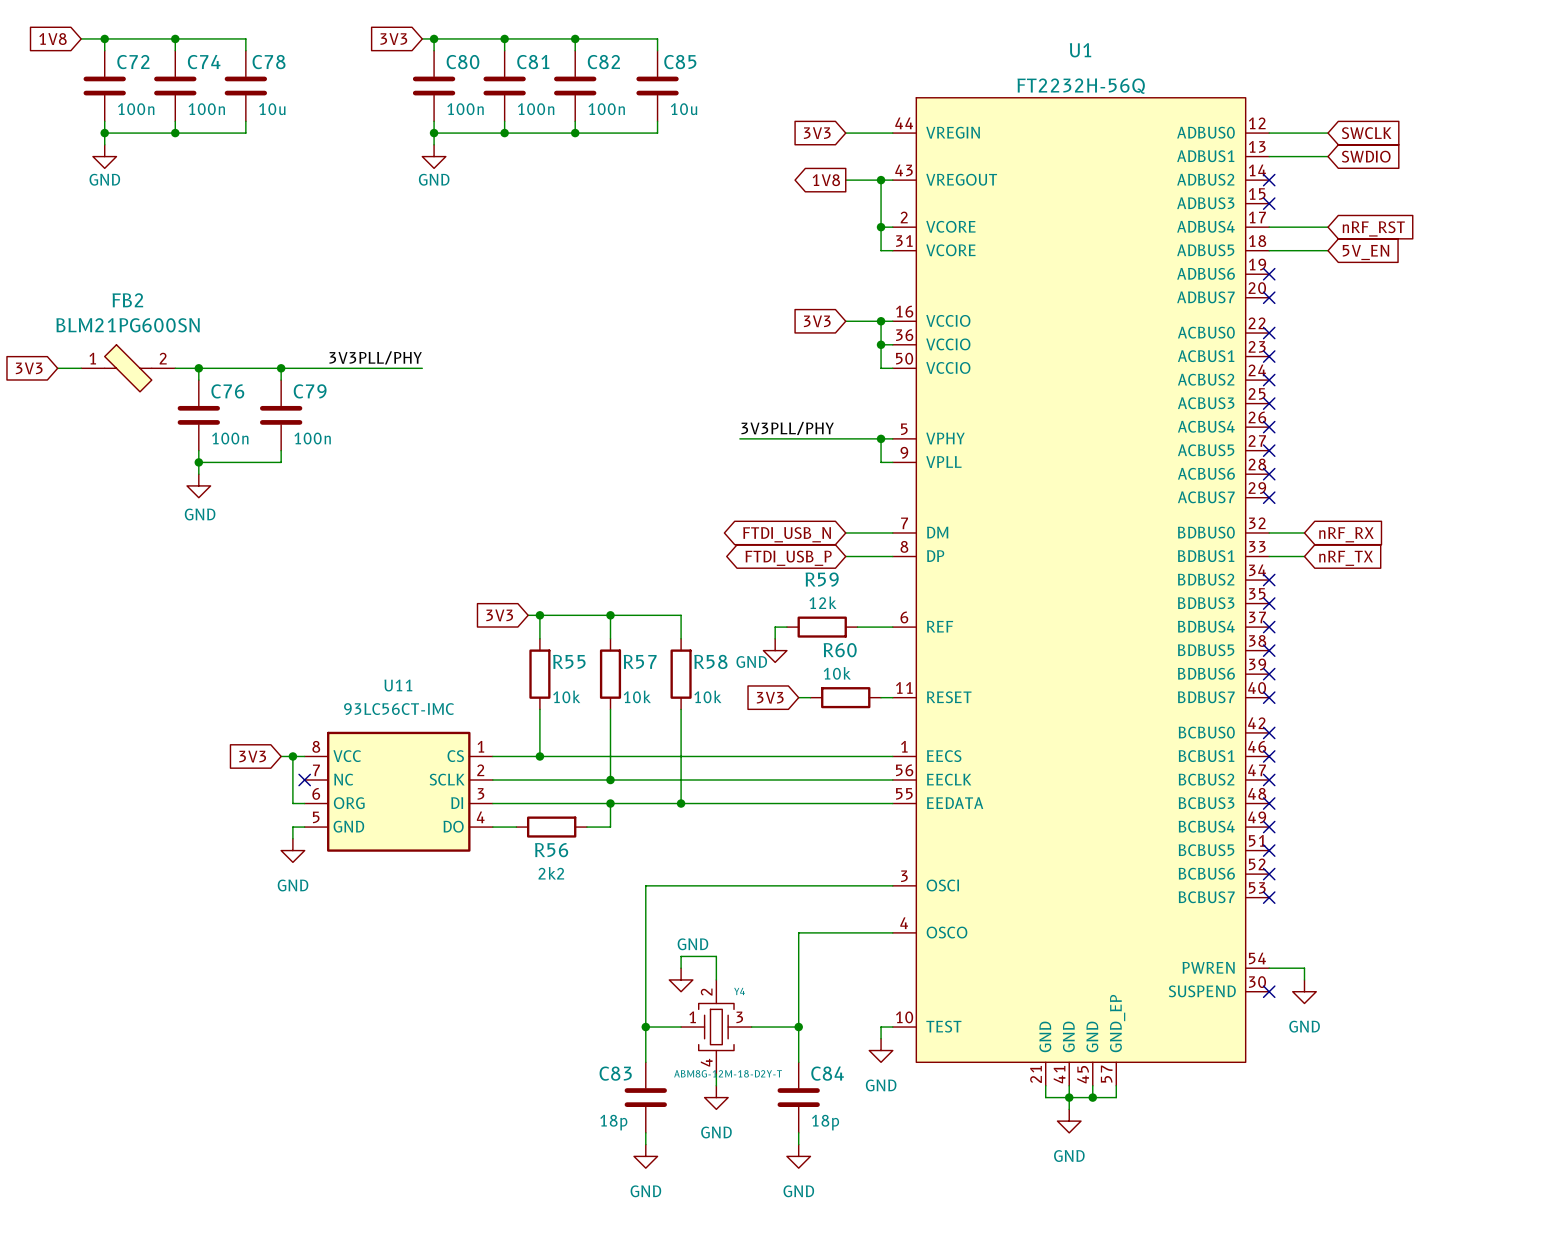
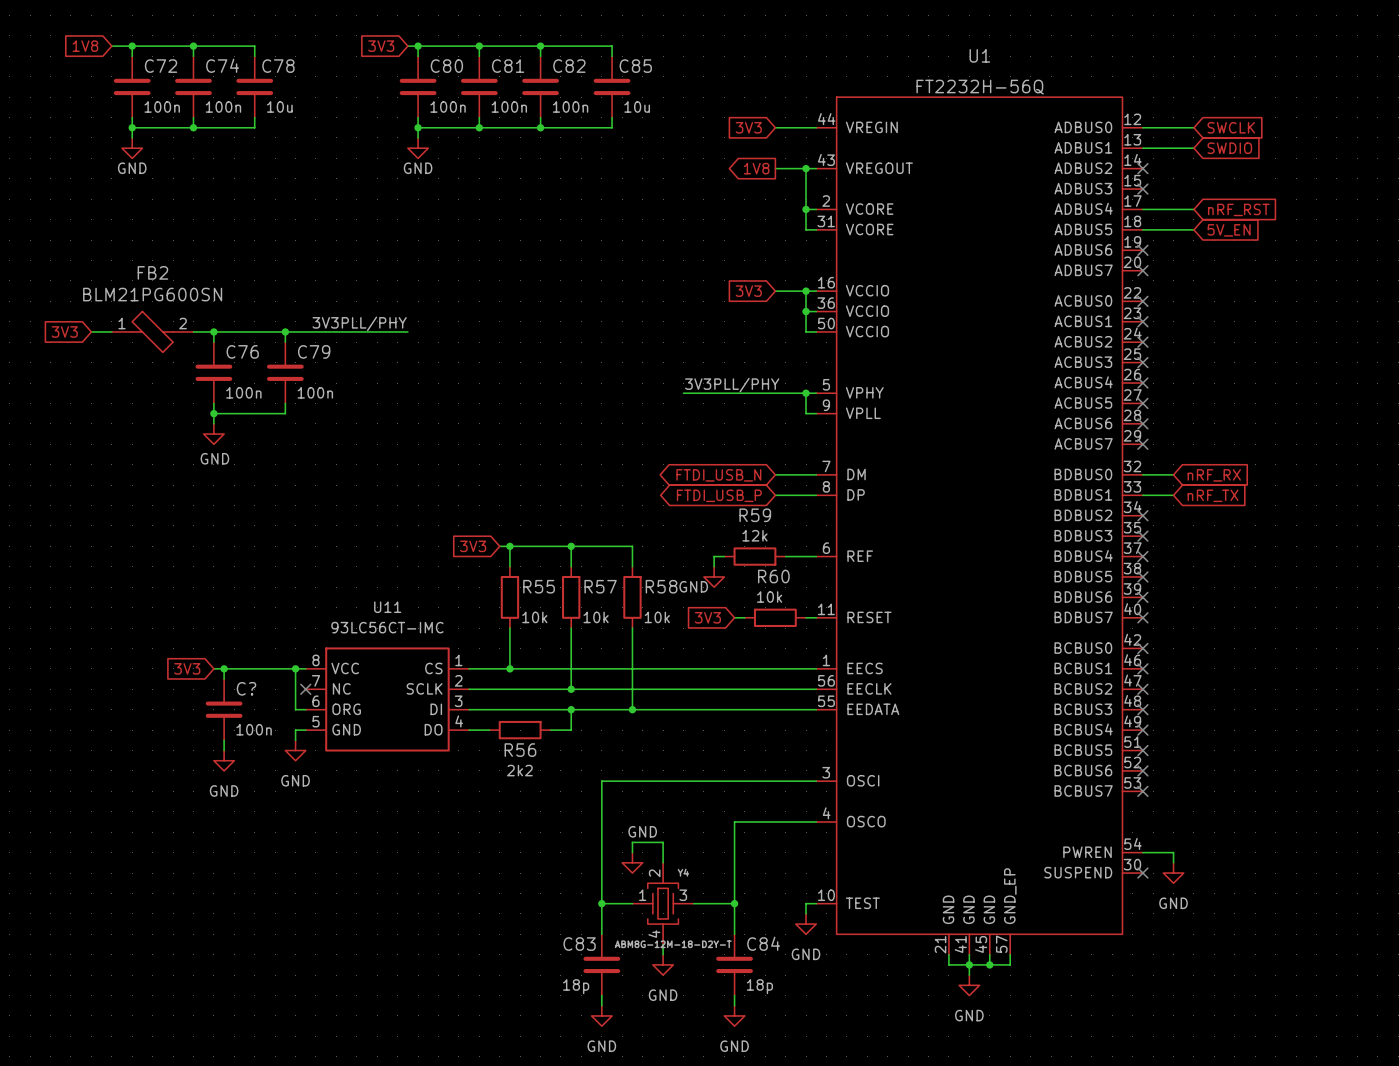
wire: none -> (213, 668) (285, 668)
wire: none -> (224, 668) (224, 679)
junction: none -> (224, 668)
global label position: 3V3 (252, 756) -> 3V3 (187, 668)
C?: none -> (224, 709)
wire: none -> (224, 740) (224, 750)
power symbol: none -> GND (224, 760)

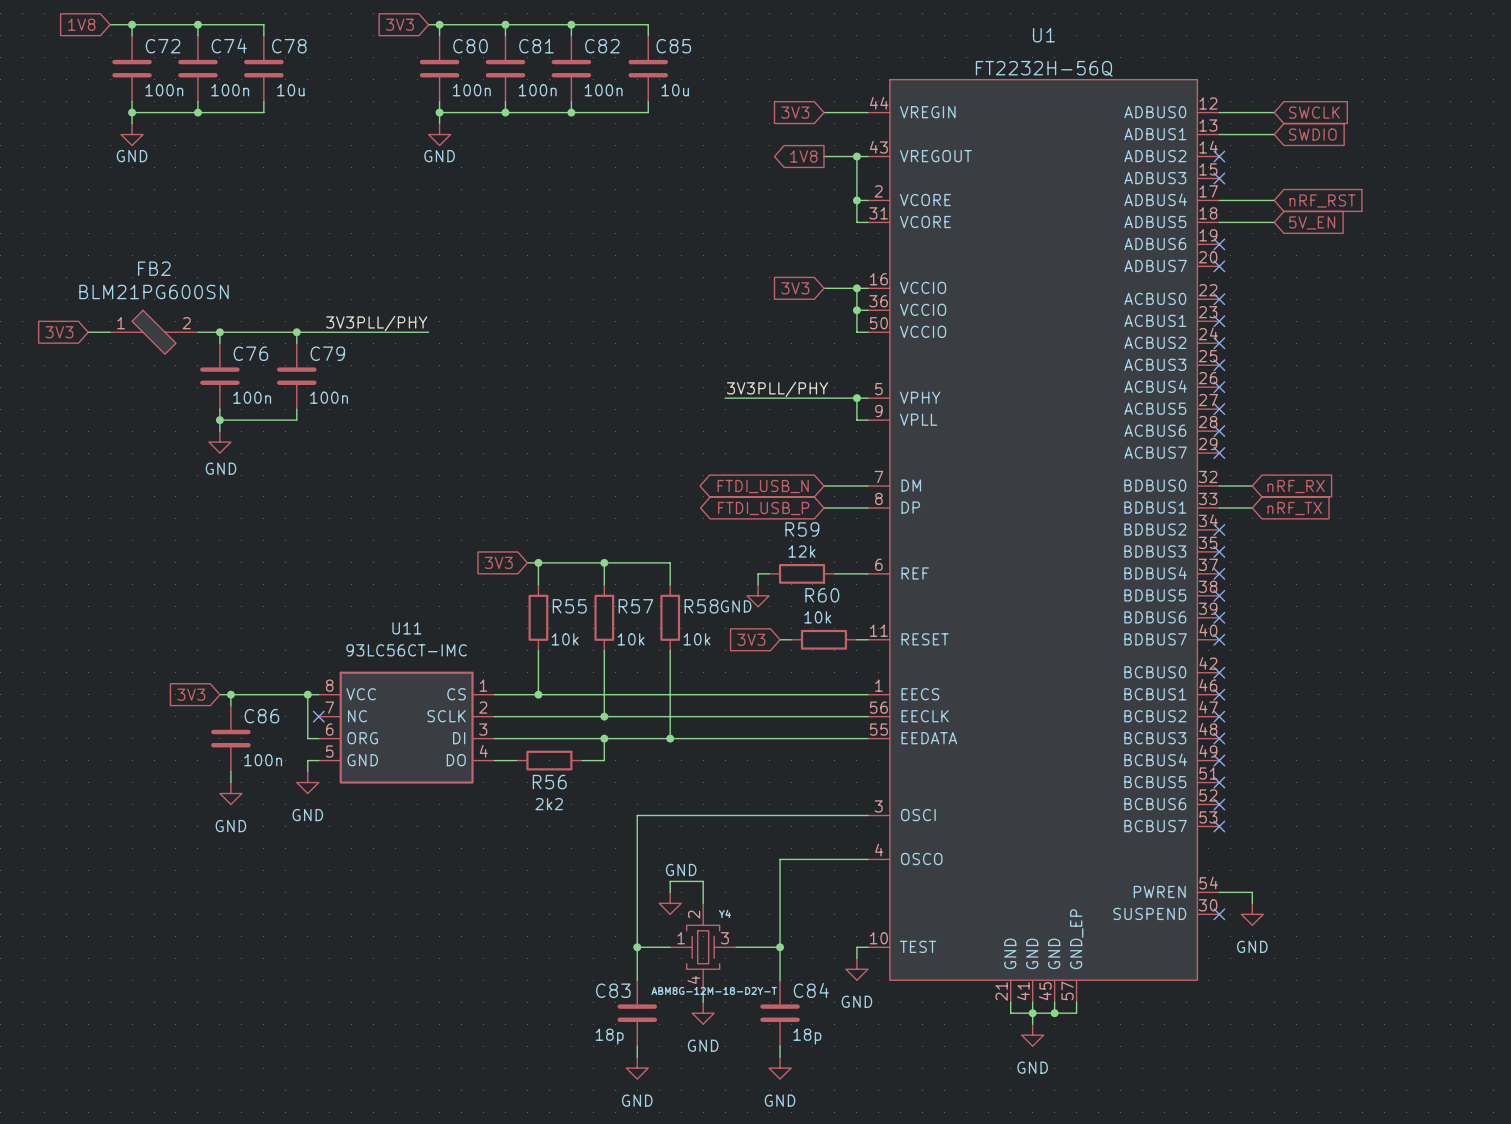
C? name: C? (246, 688) -> C86 (261, 716)

